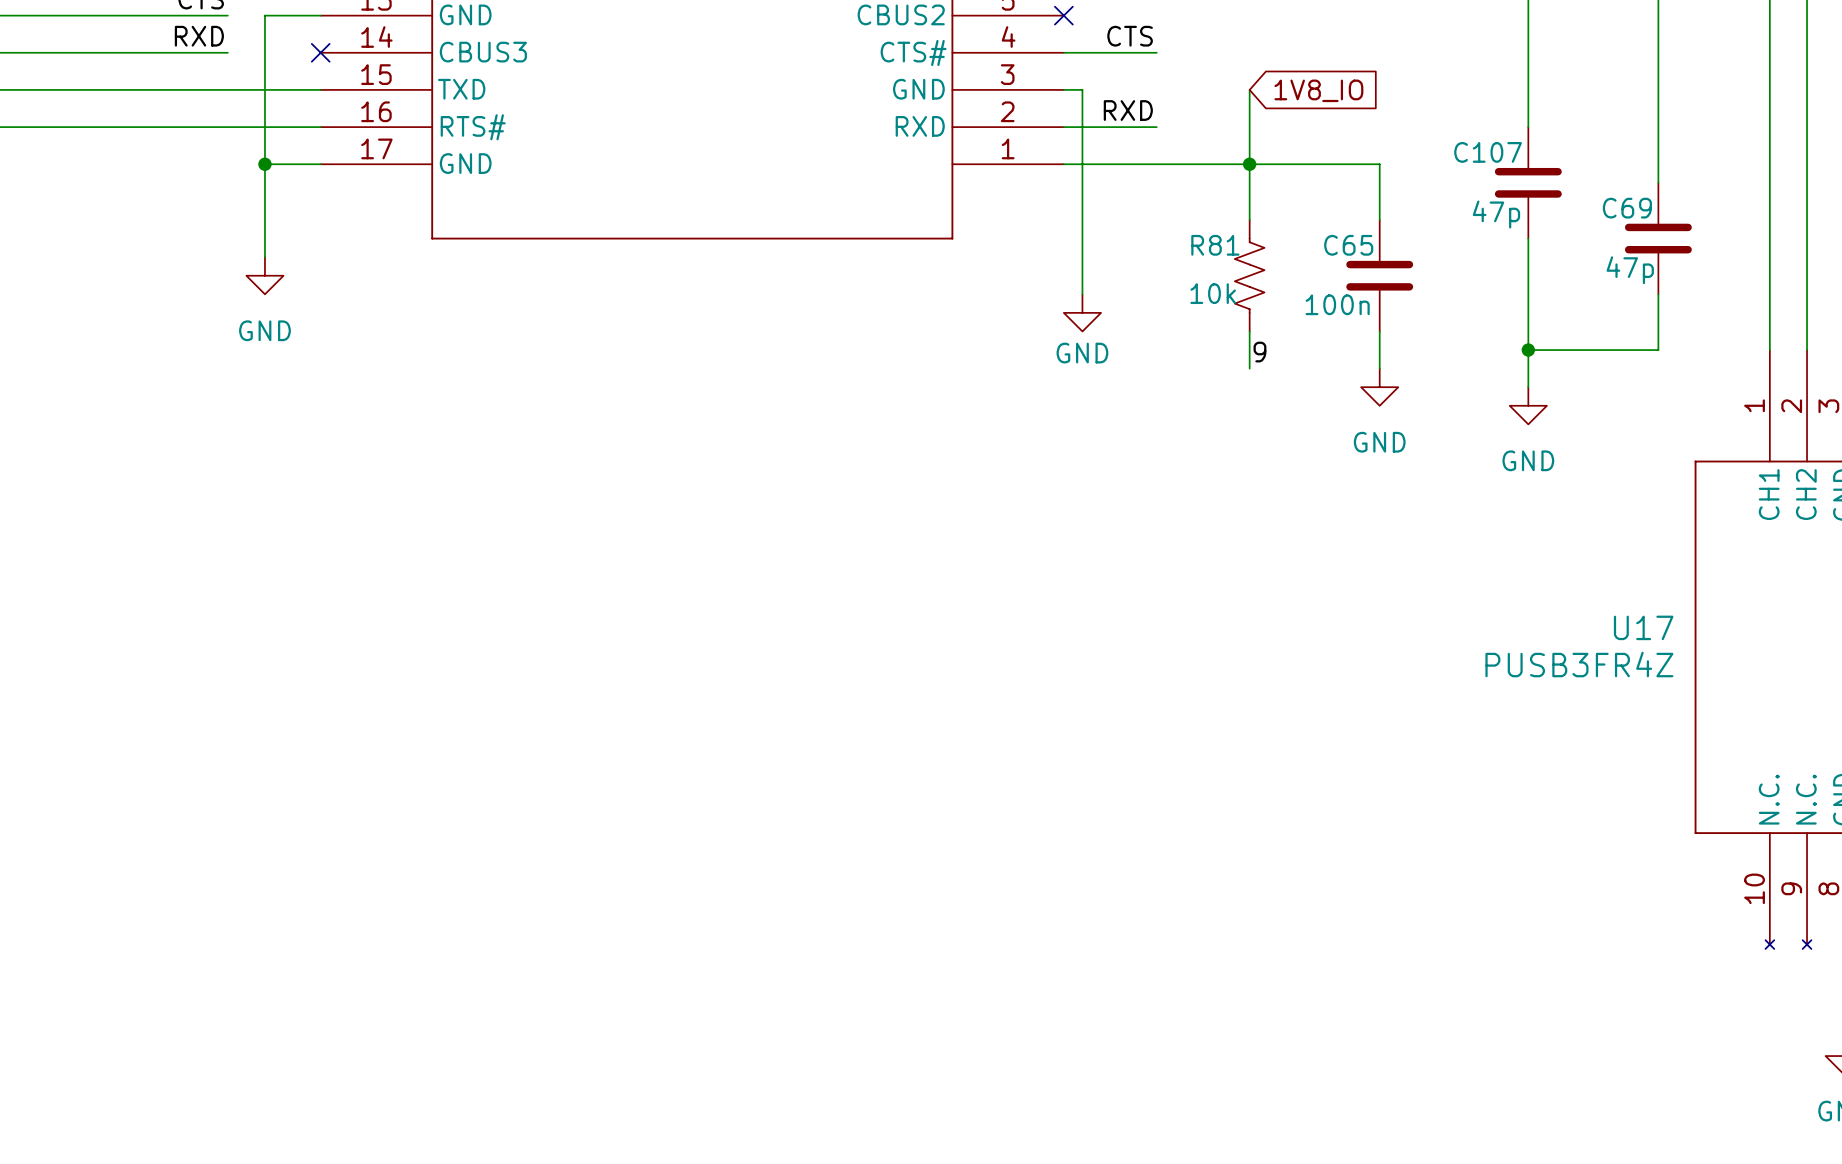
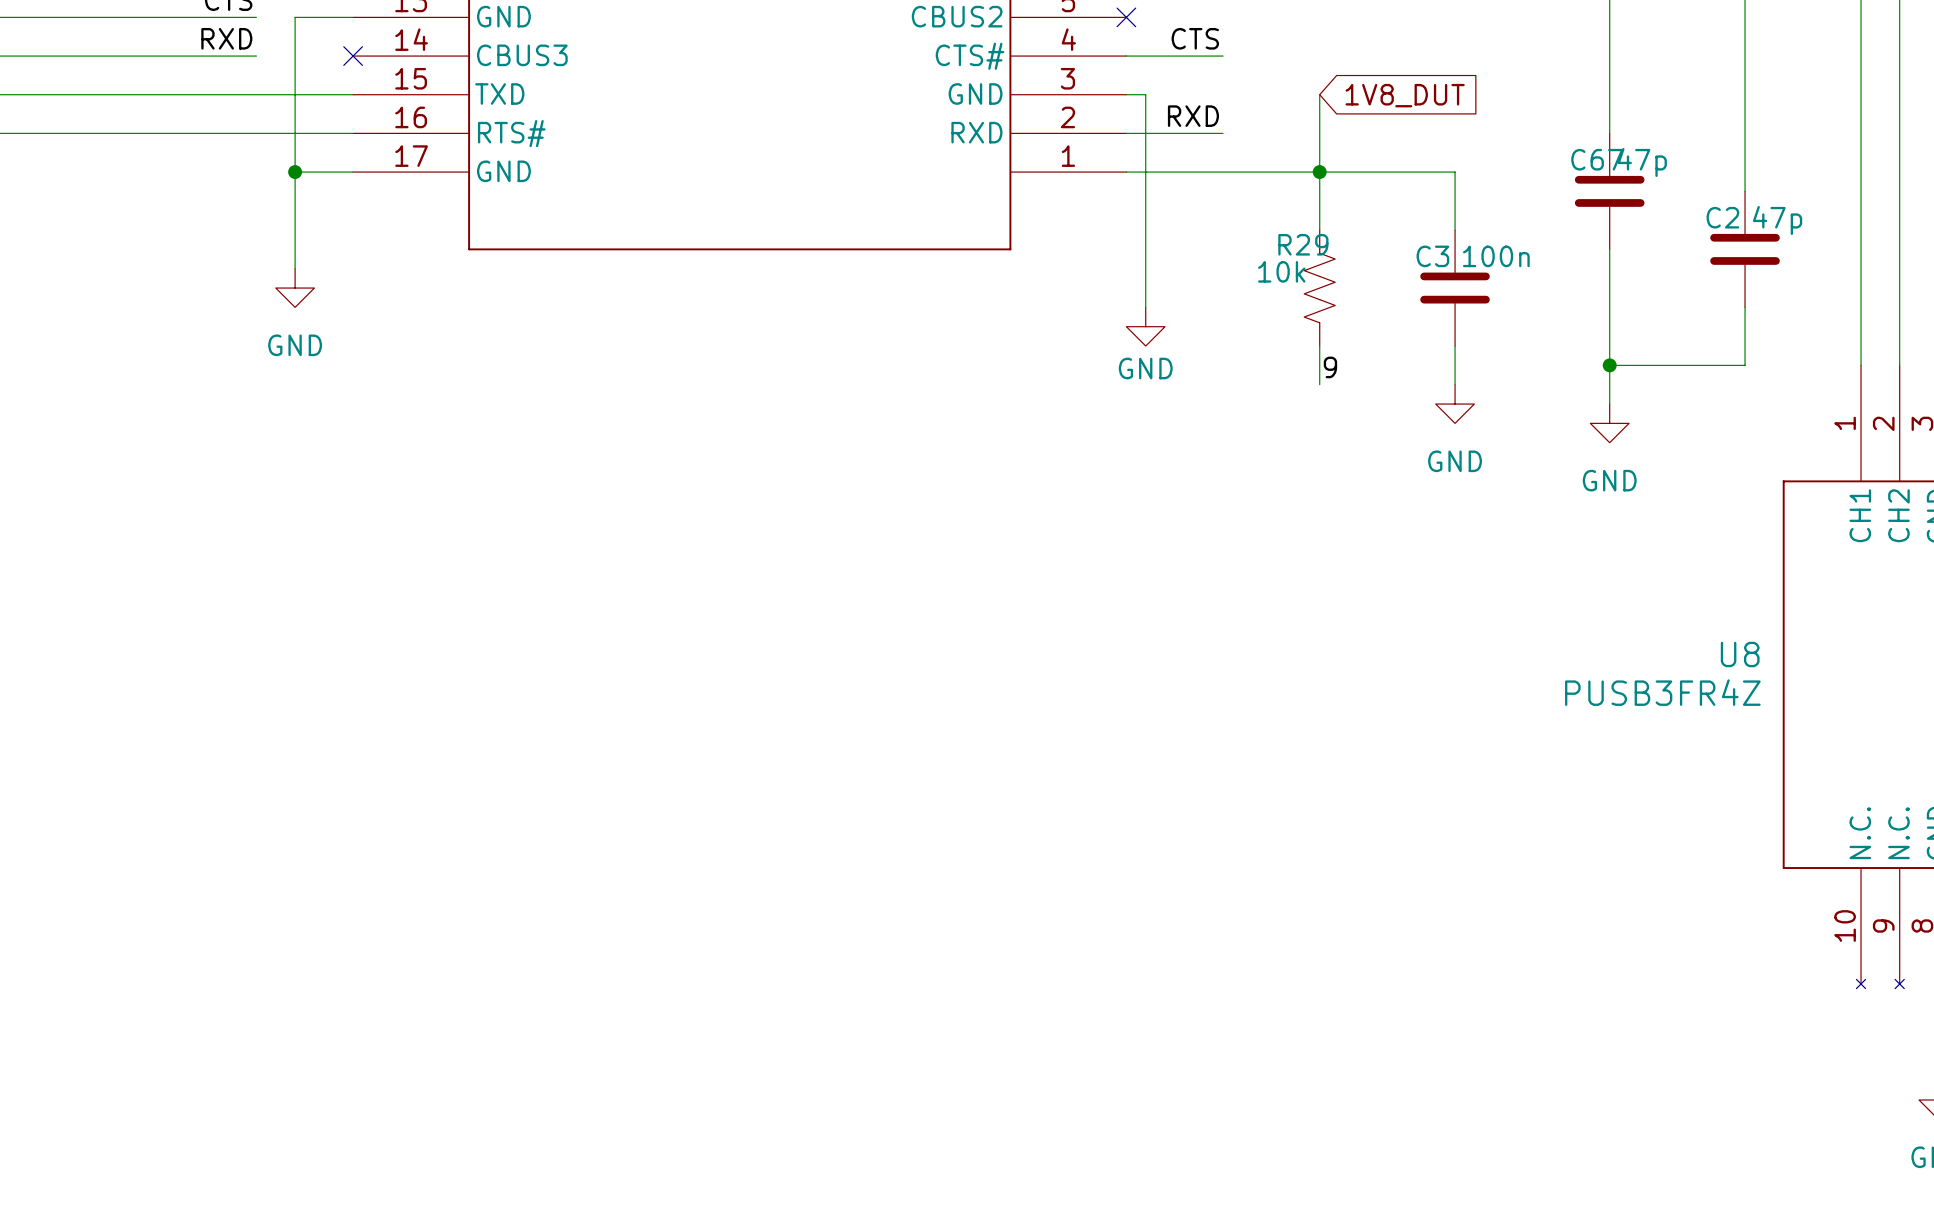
global label: 1V8_IO (1318, 90) -> 1V8_DUT (1405, 95)
C107 name: C107 (1488, 152) -> C67 (1597, 159)
C69 name: C69 (1627, 208) -> C2 (1722, 217)
C107 value position: 47p (1496, 214) -> 47p (1642, 162)
R81 name: R81 (1215, 245) -> R29 (1303, 244)
C65 name: C65 (1348, 245) -> C3 (1432, 256)
C69 value position: 47p (1630, 270) -> 47p (1777, 220)
R81 value position: 10k (1213, 293) -> 10k (1281, 271)
C65 value position: 100n (1337, 304) -> 100n (1496, 256)
U17 name: U17 (1643, 627) -> U8 (1740, 654)

